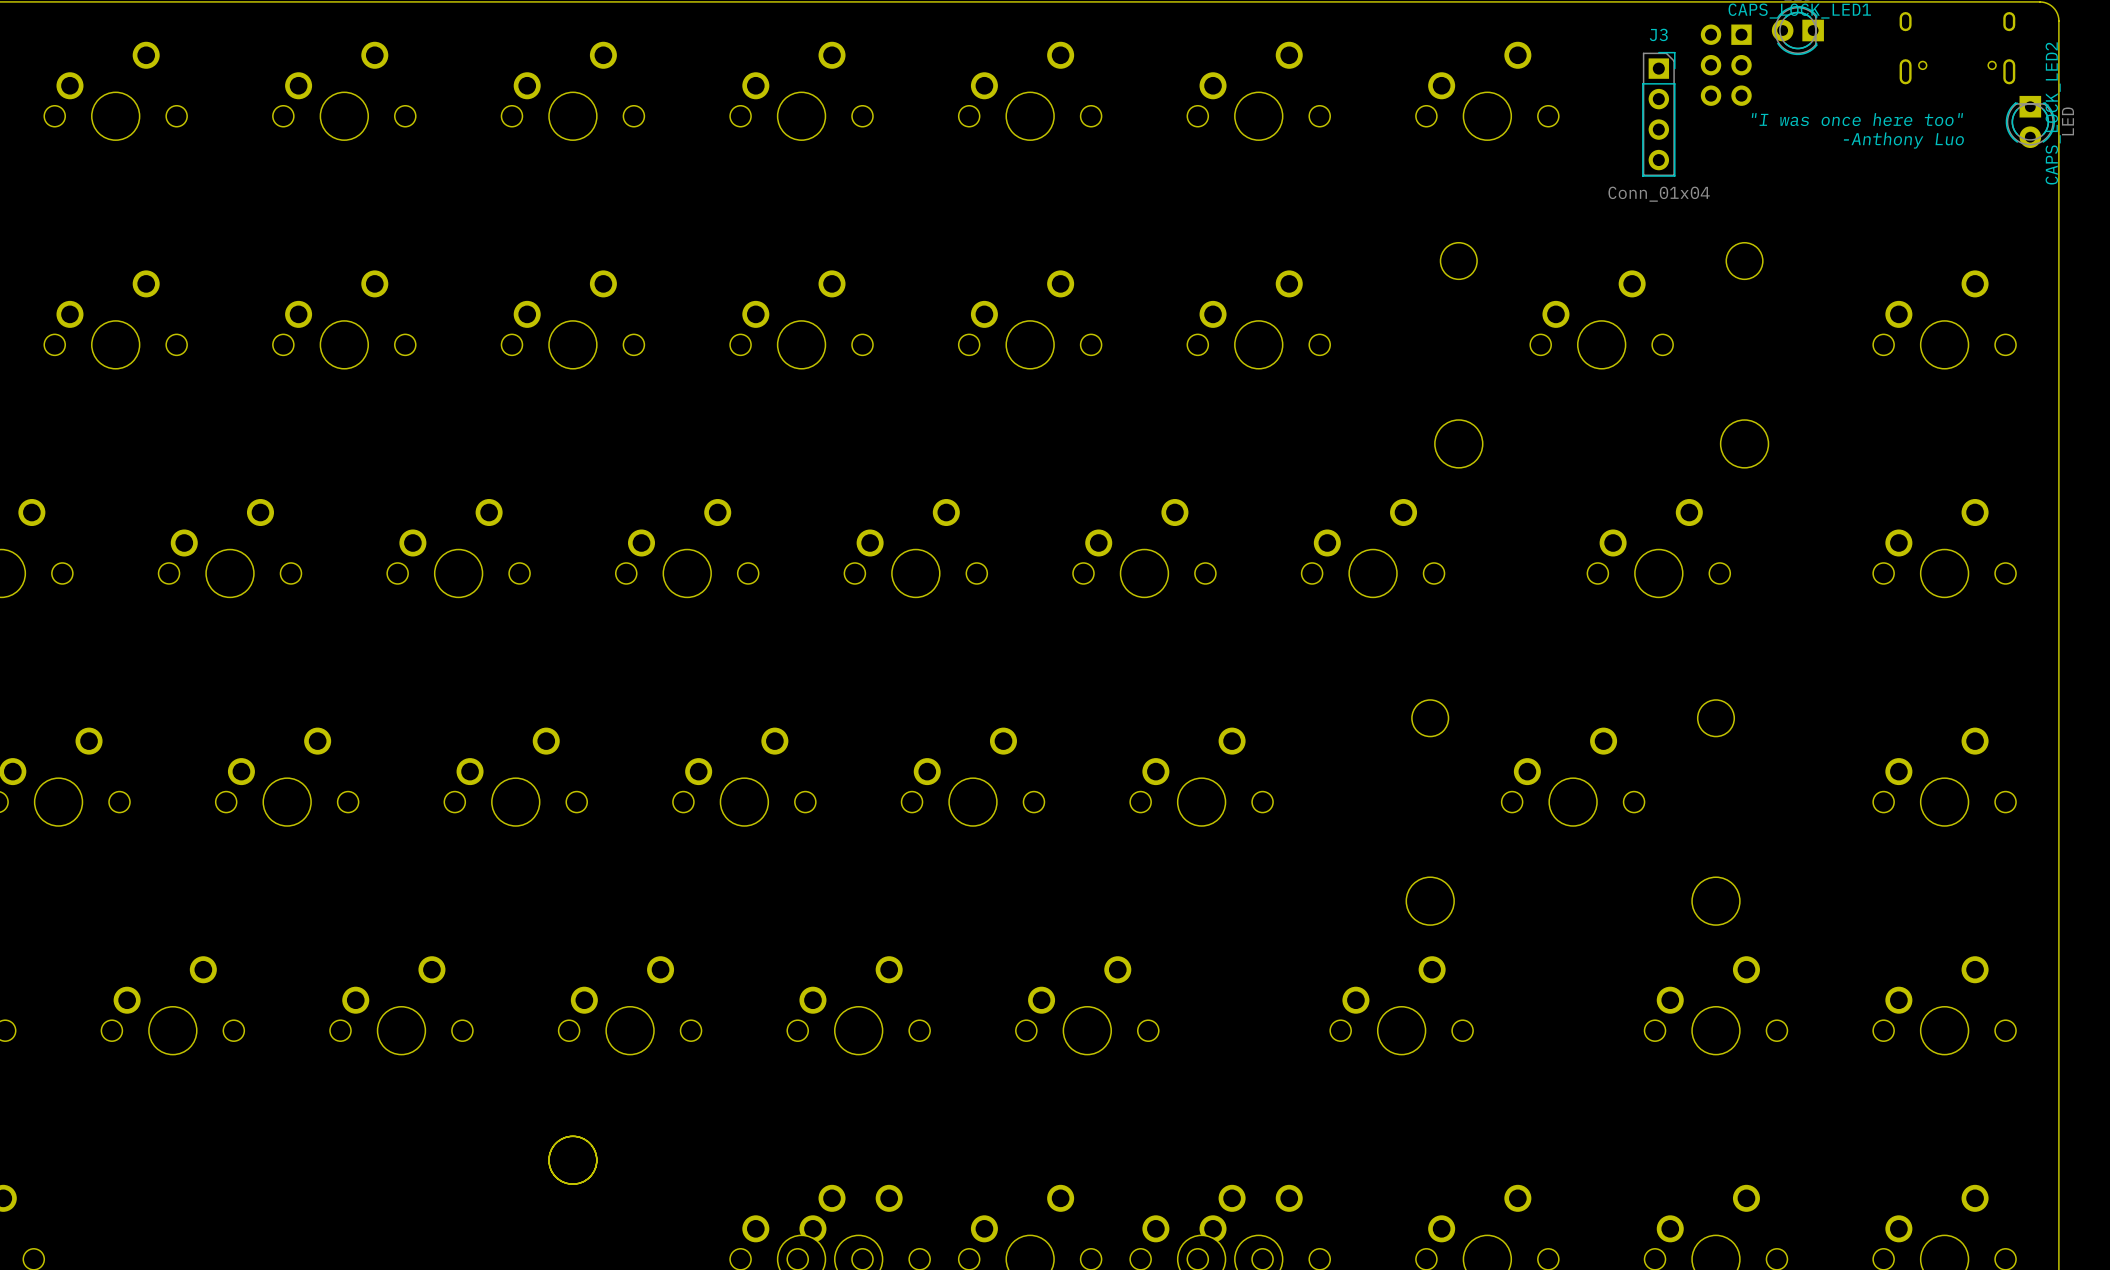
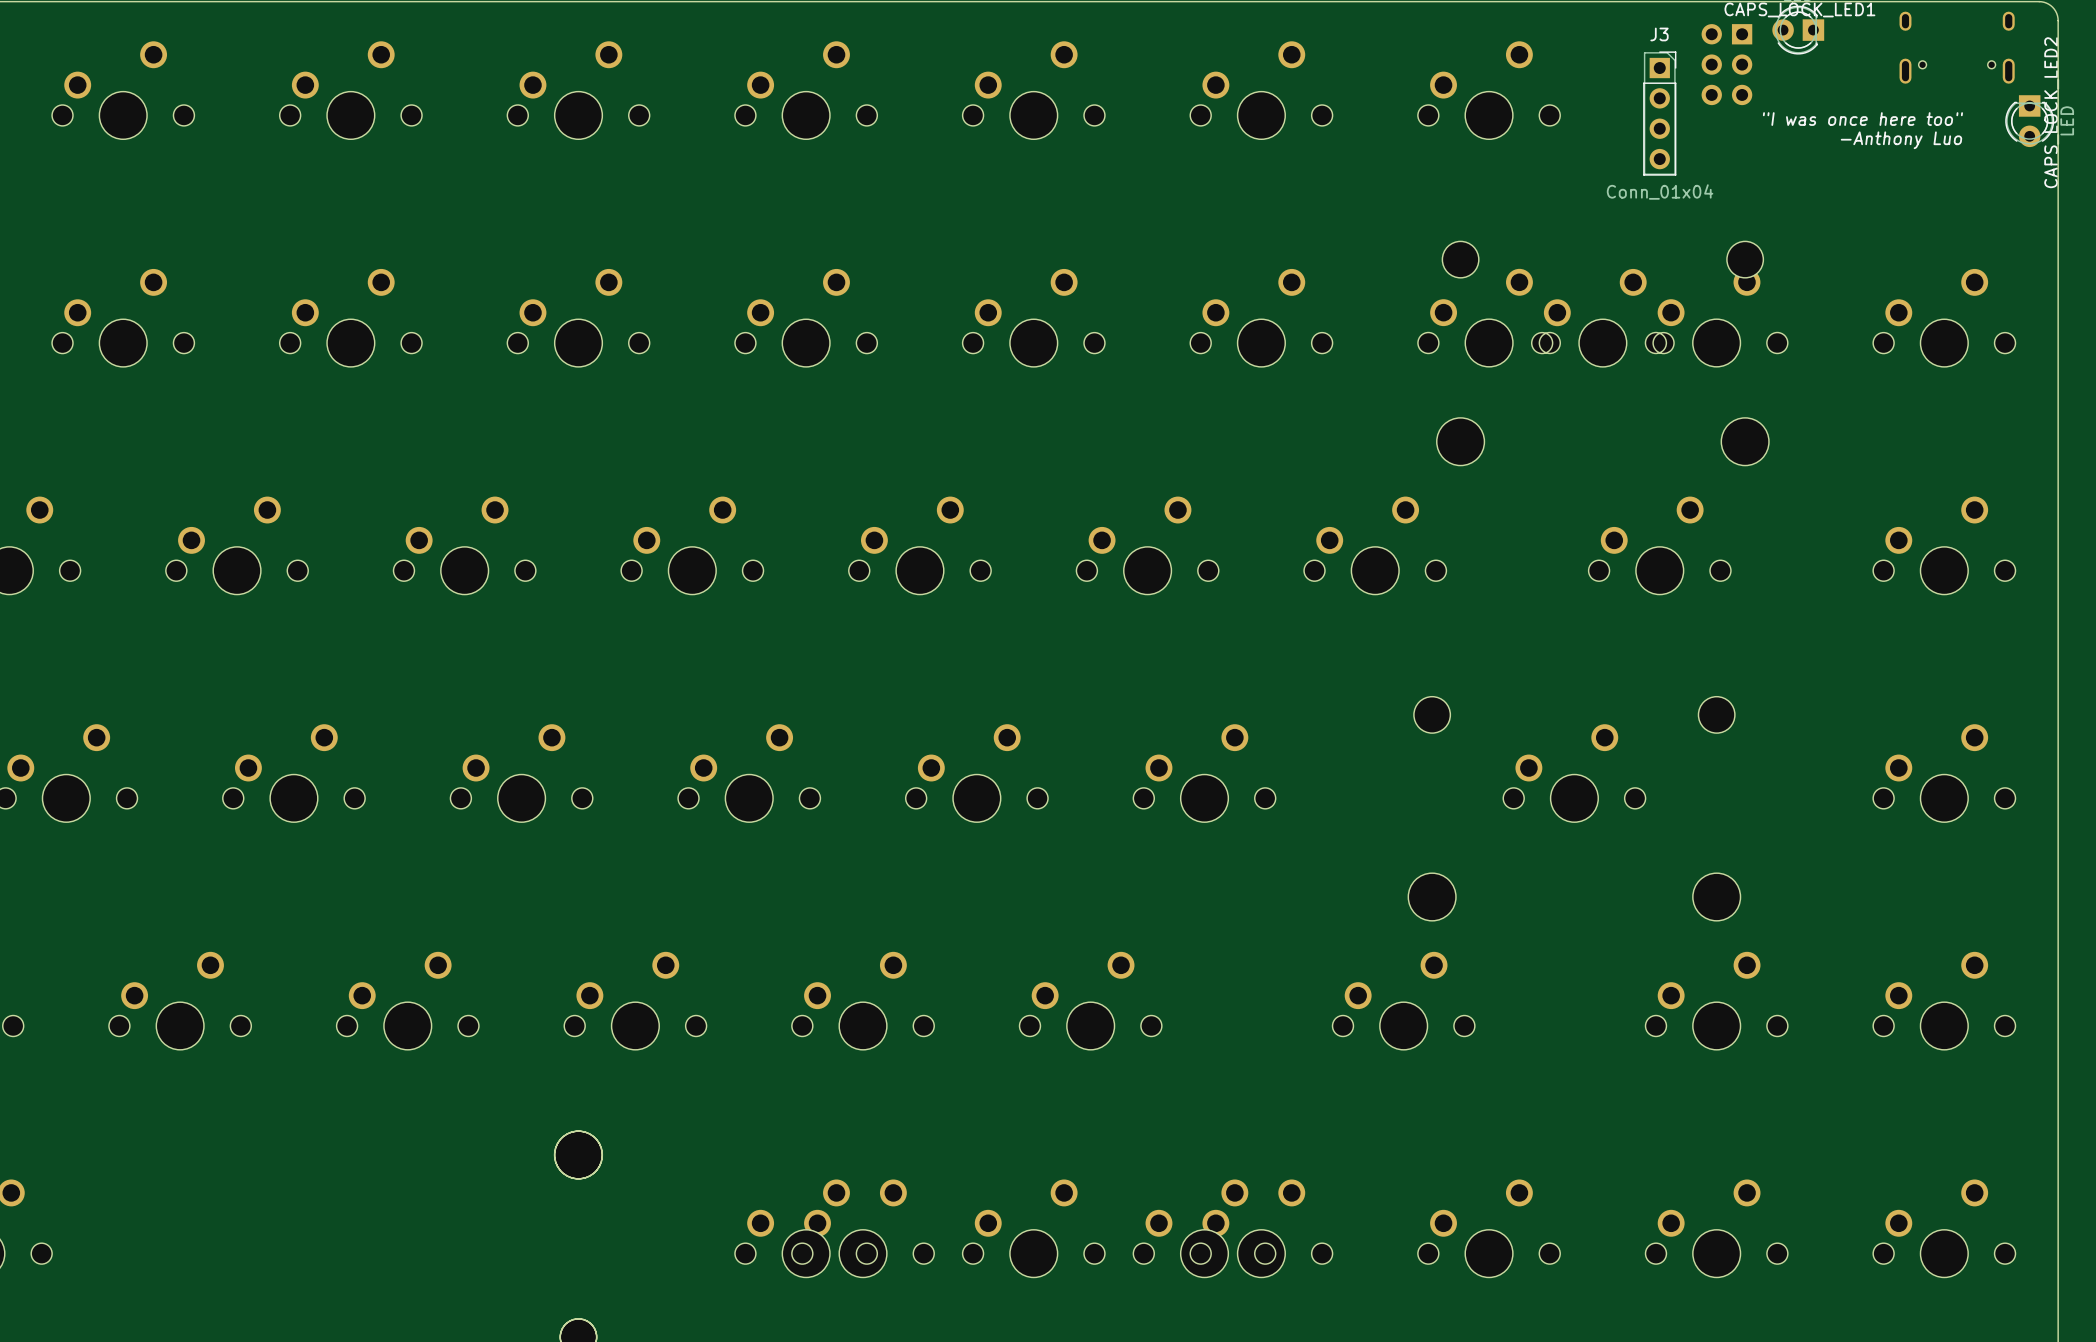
part: none -> (1489, 317)
part: none -> (1716, 317)

